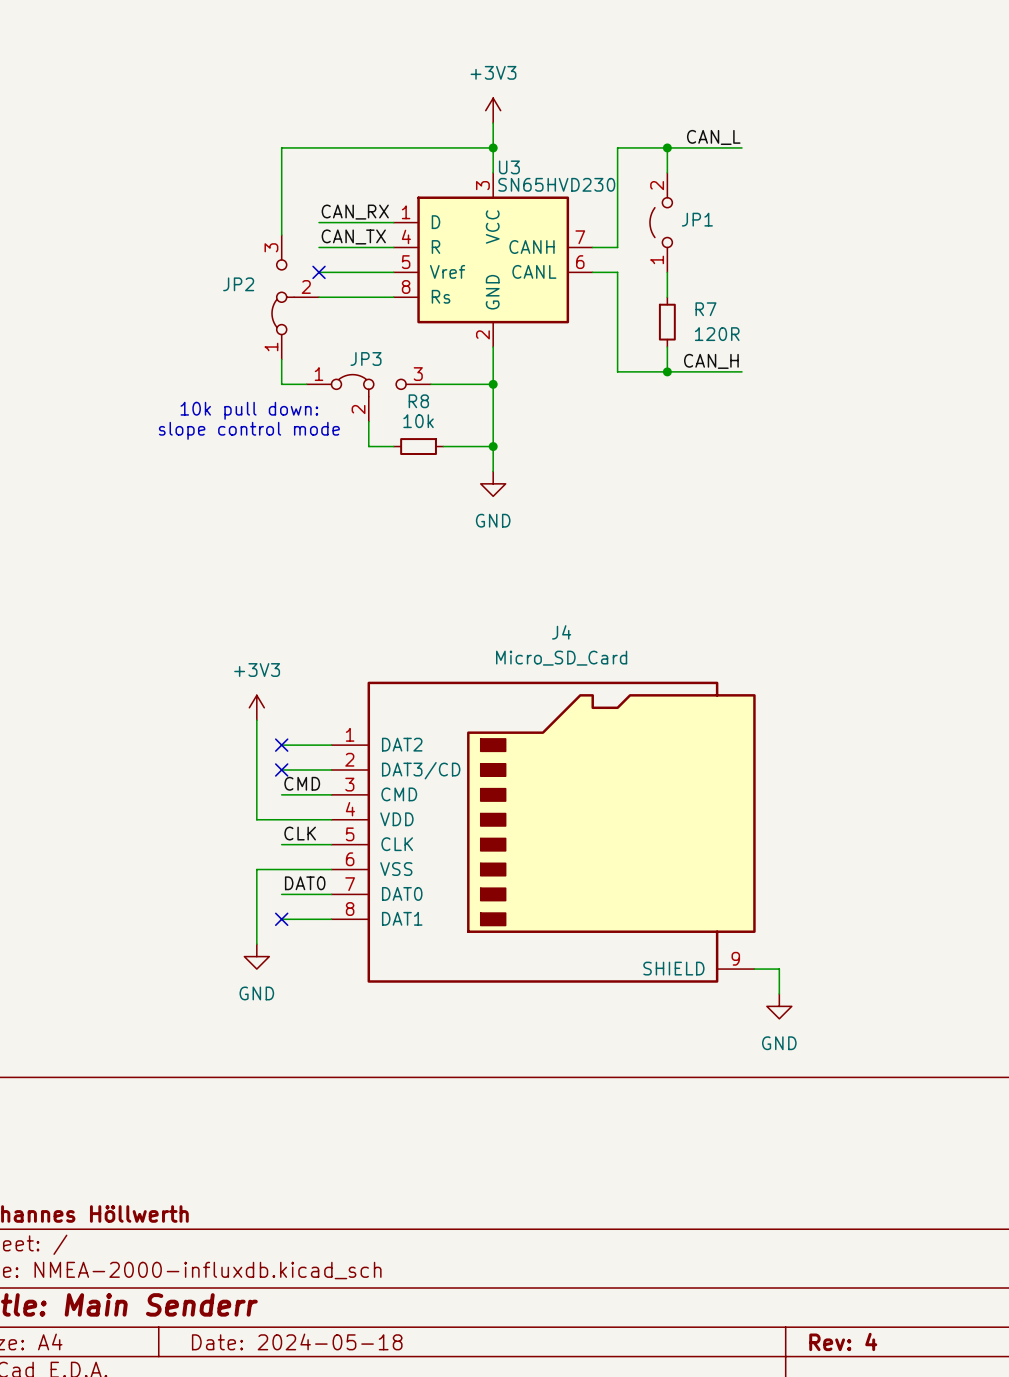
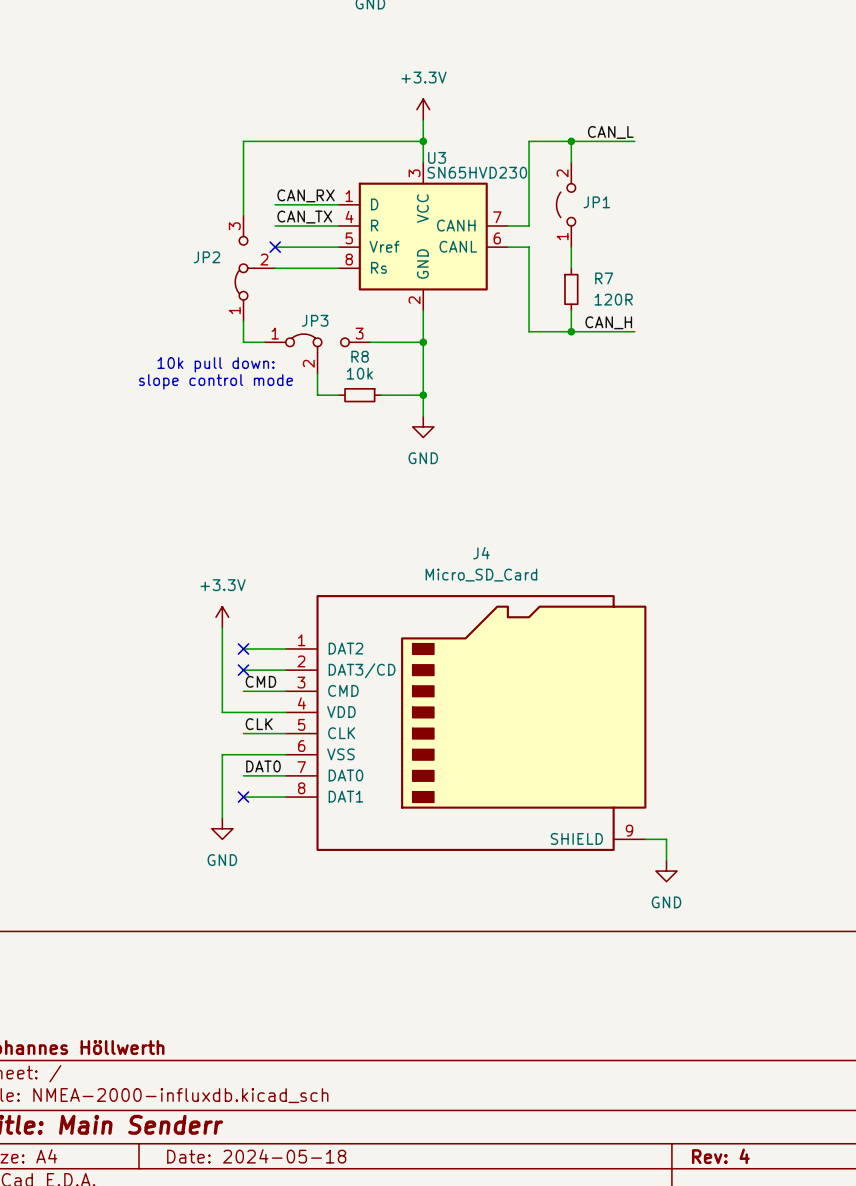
power symbol: +3V3 (493, 110) -> +3.3V (423, 109)
power symbol: +3V3 (256, 707) -> +3.3V (222, 617)

